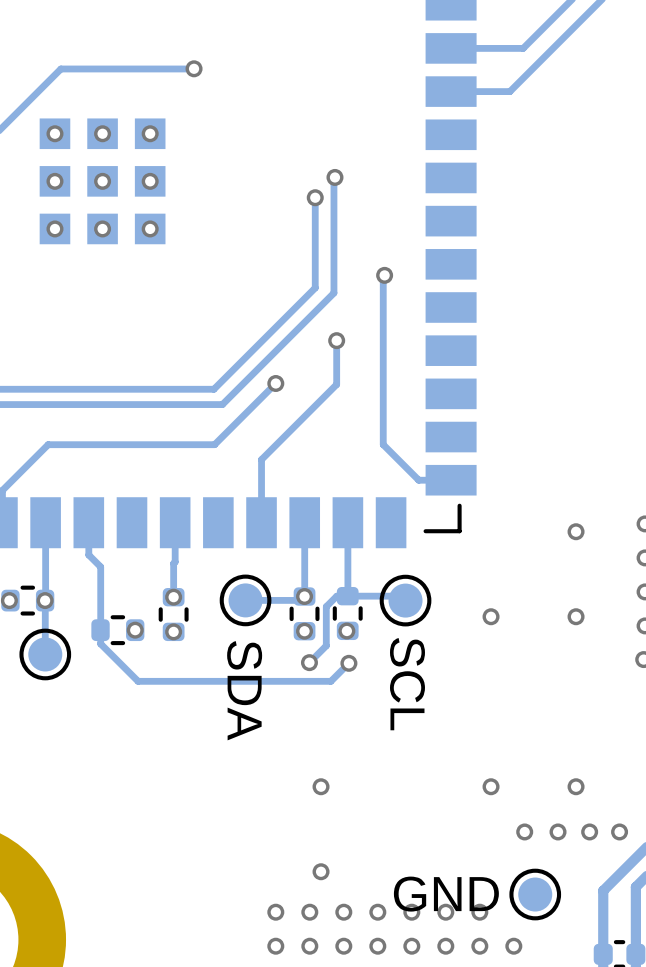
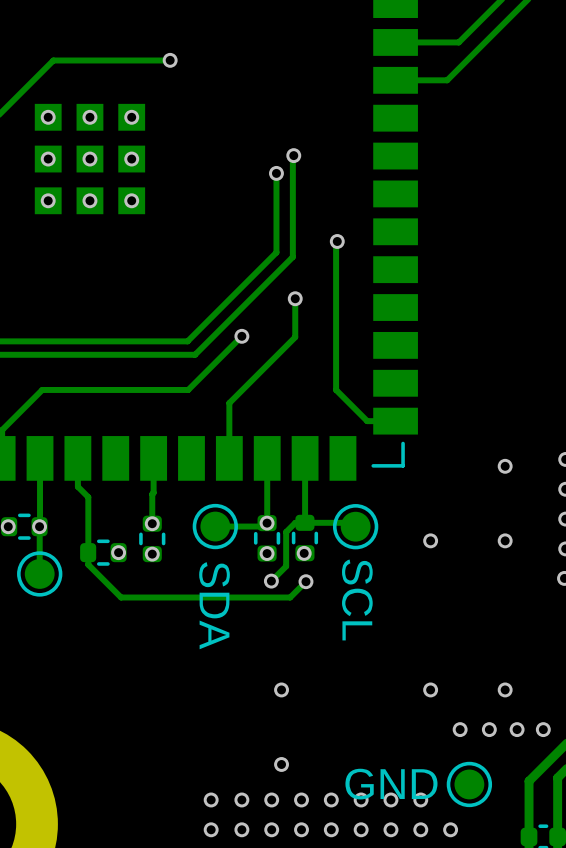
via: none -> (211, 799)
via: none -> (211, 829)

